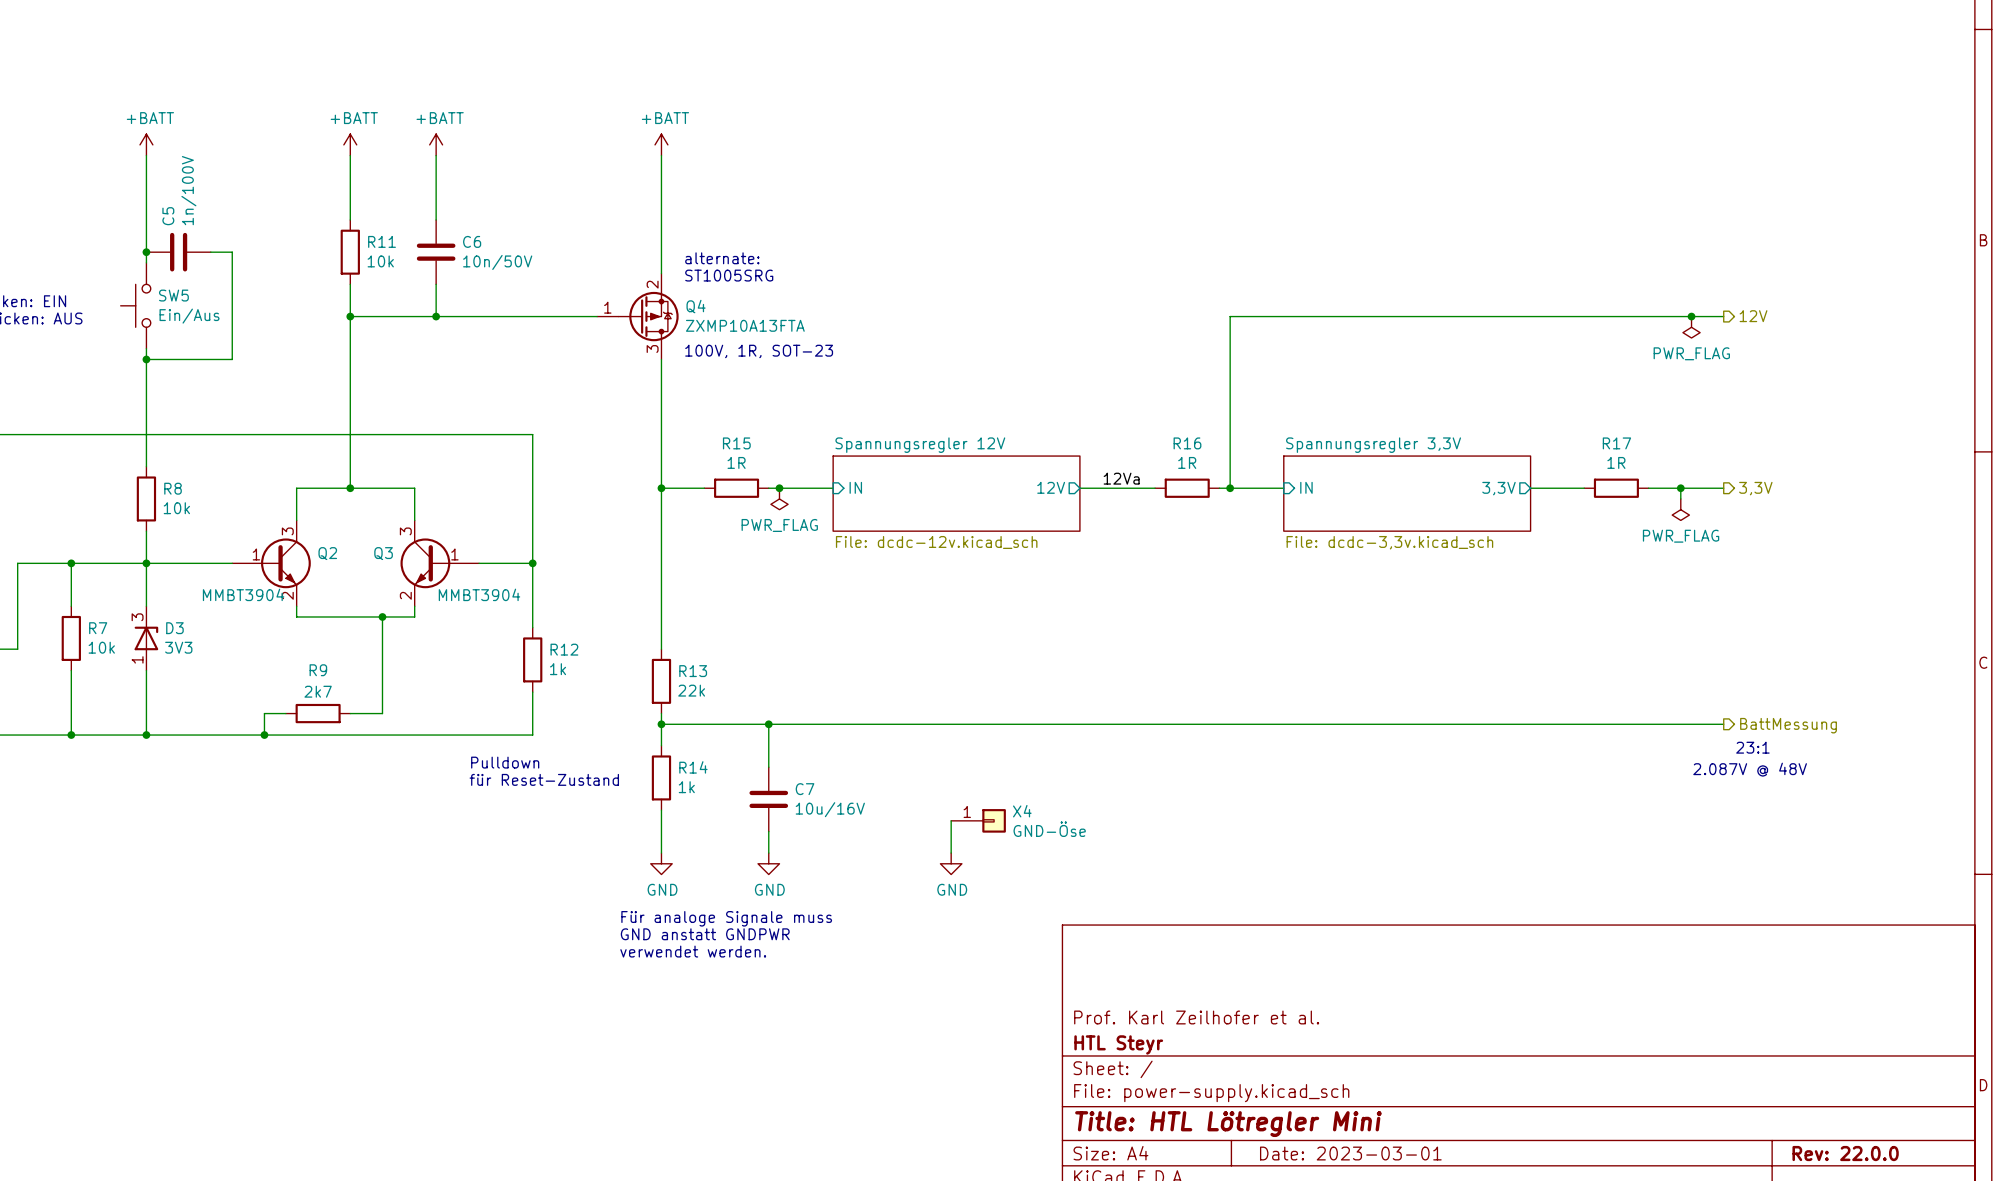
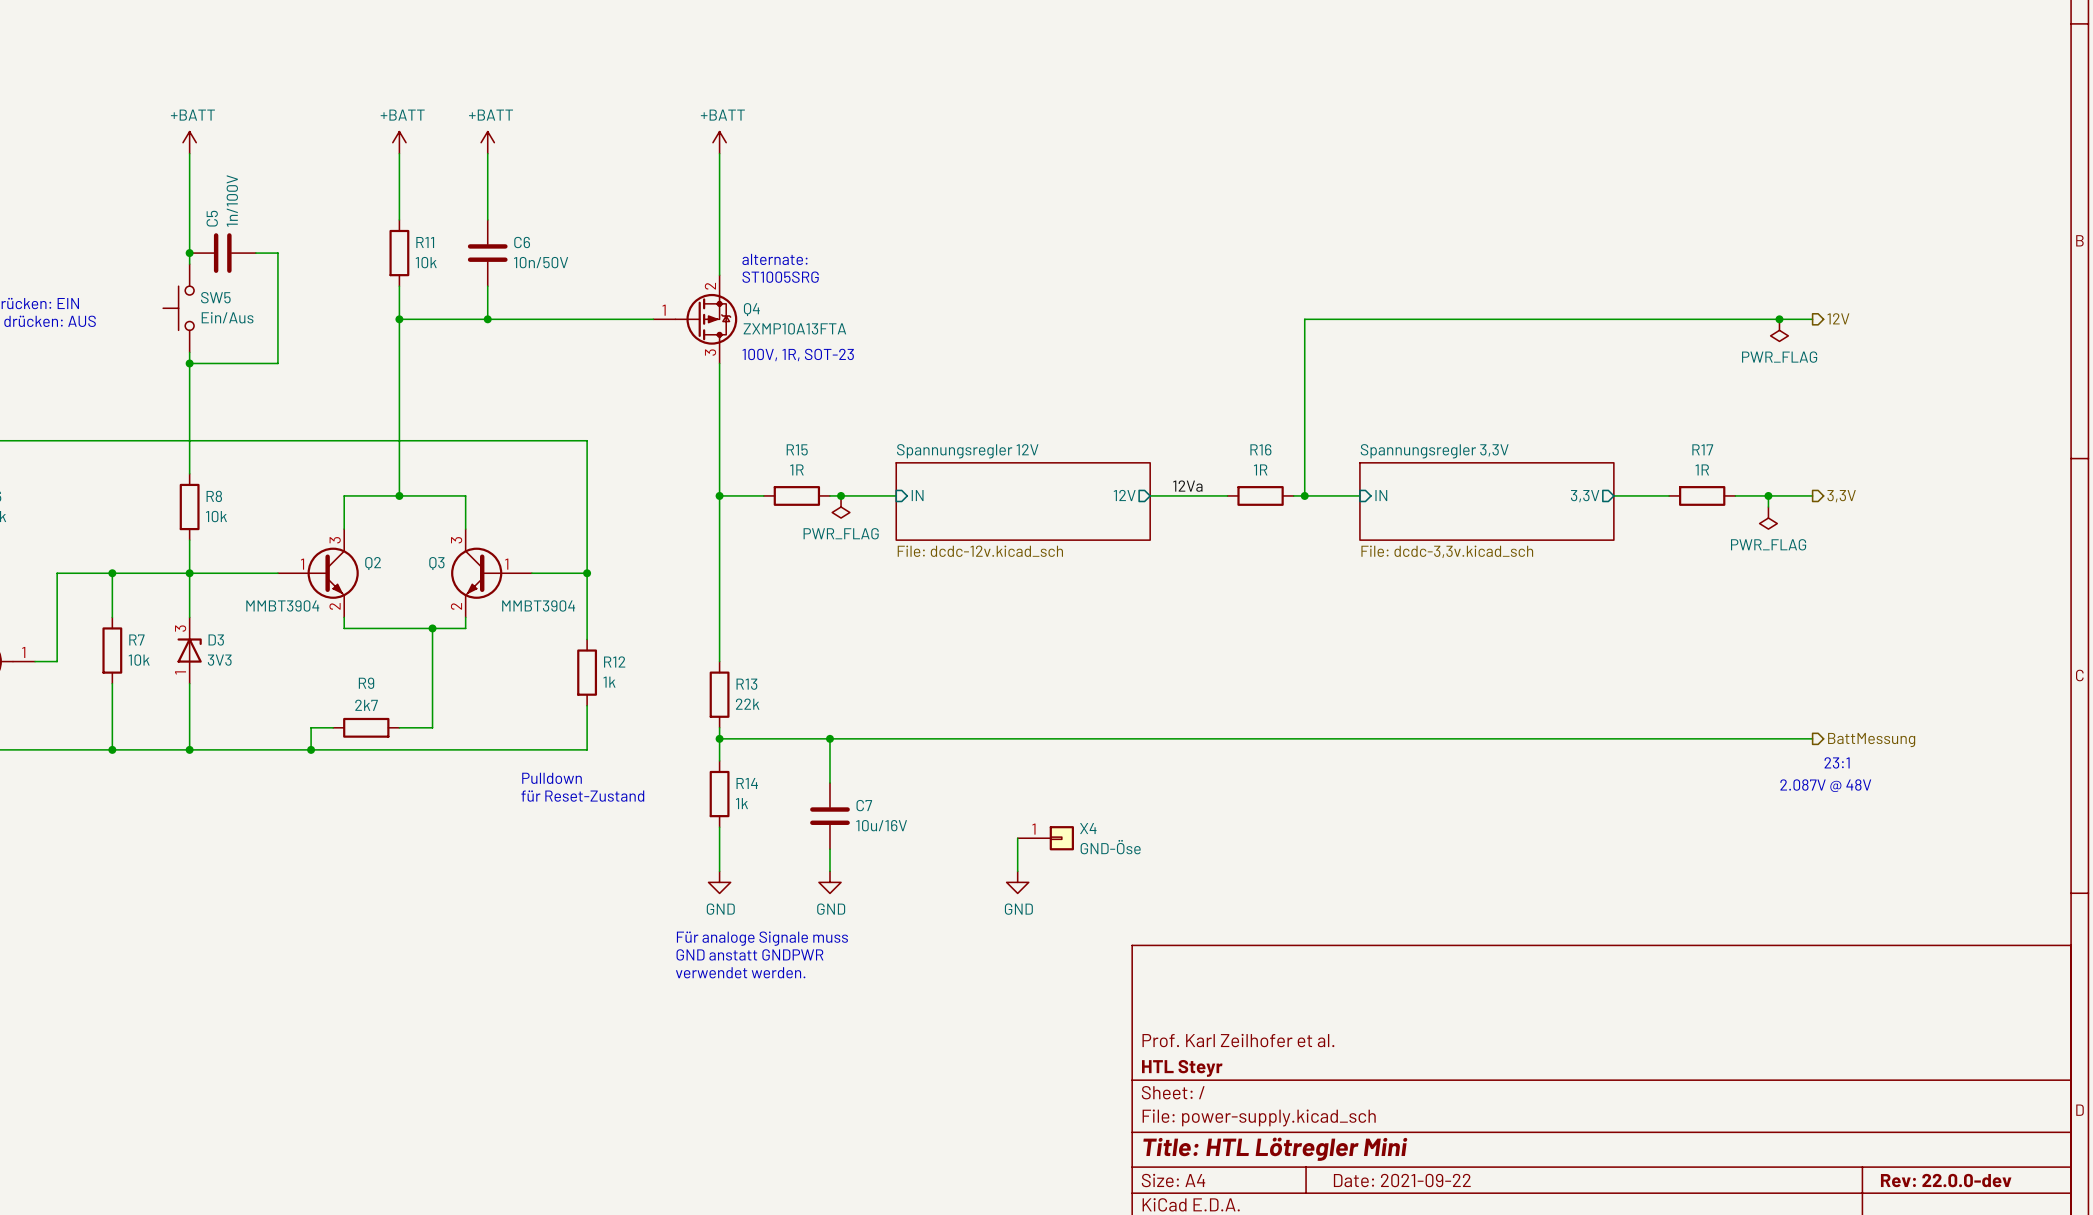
title block: Date: 2023-03-01 (1350, 1153) -> Date: 2021-09-22 (1402, 1180)
title block: Rev: 22.0.0 (1845, 1153) -> Rev: 22.0.0-dev (1946, 1180)

